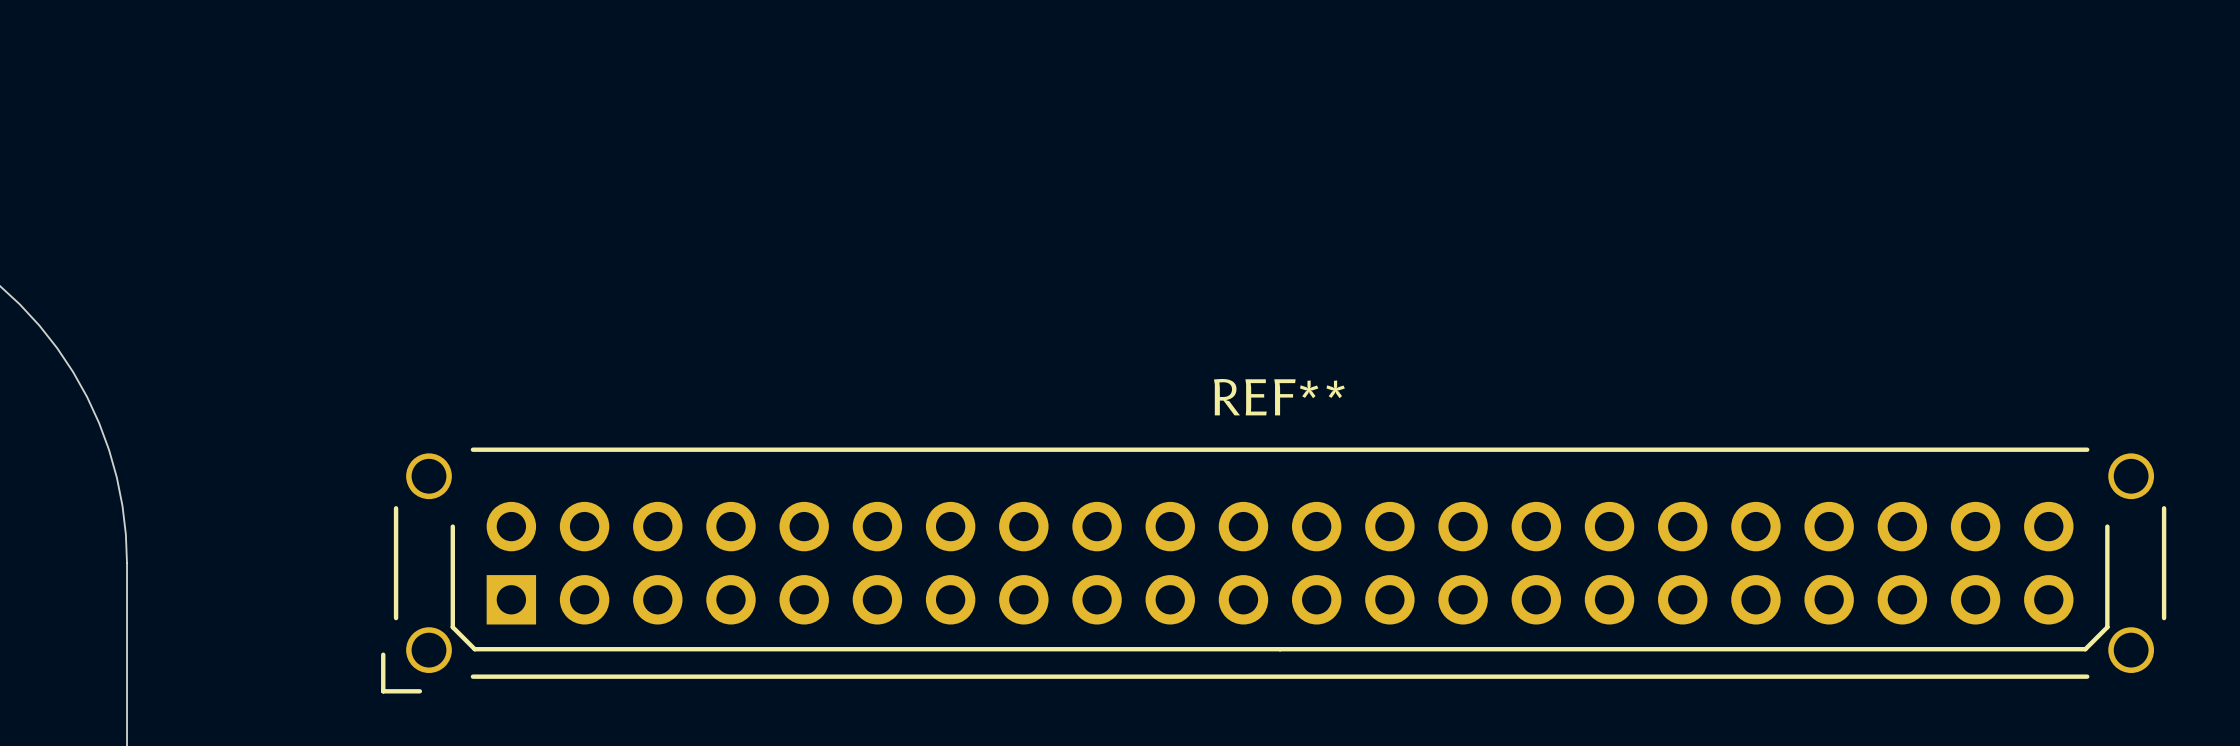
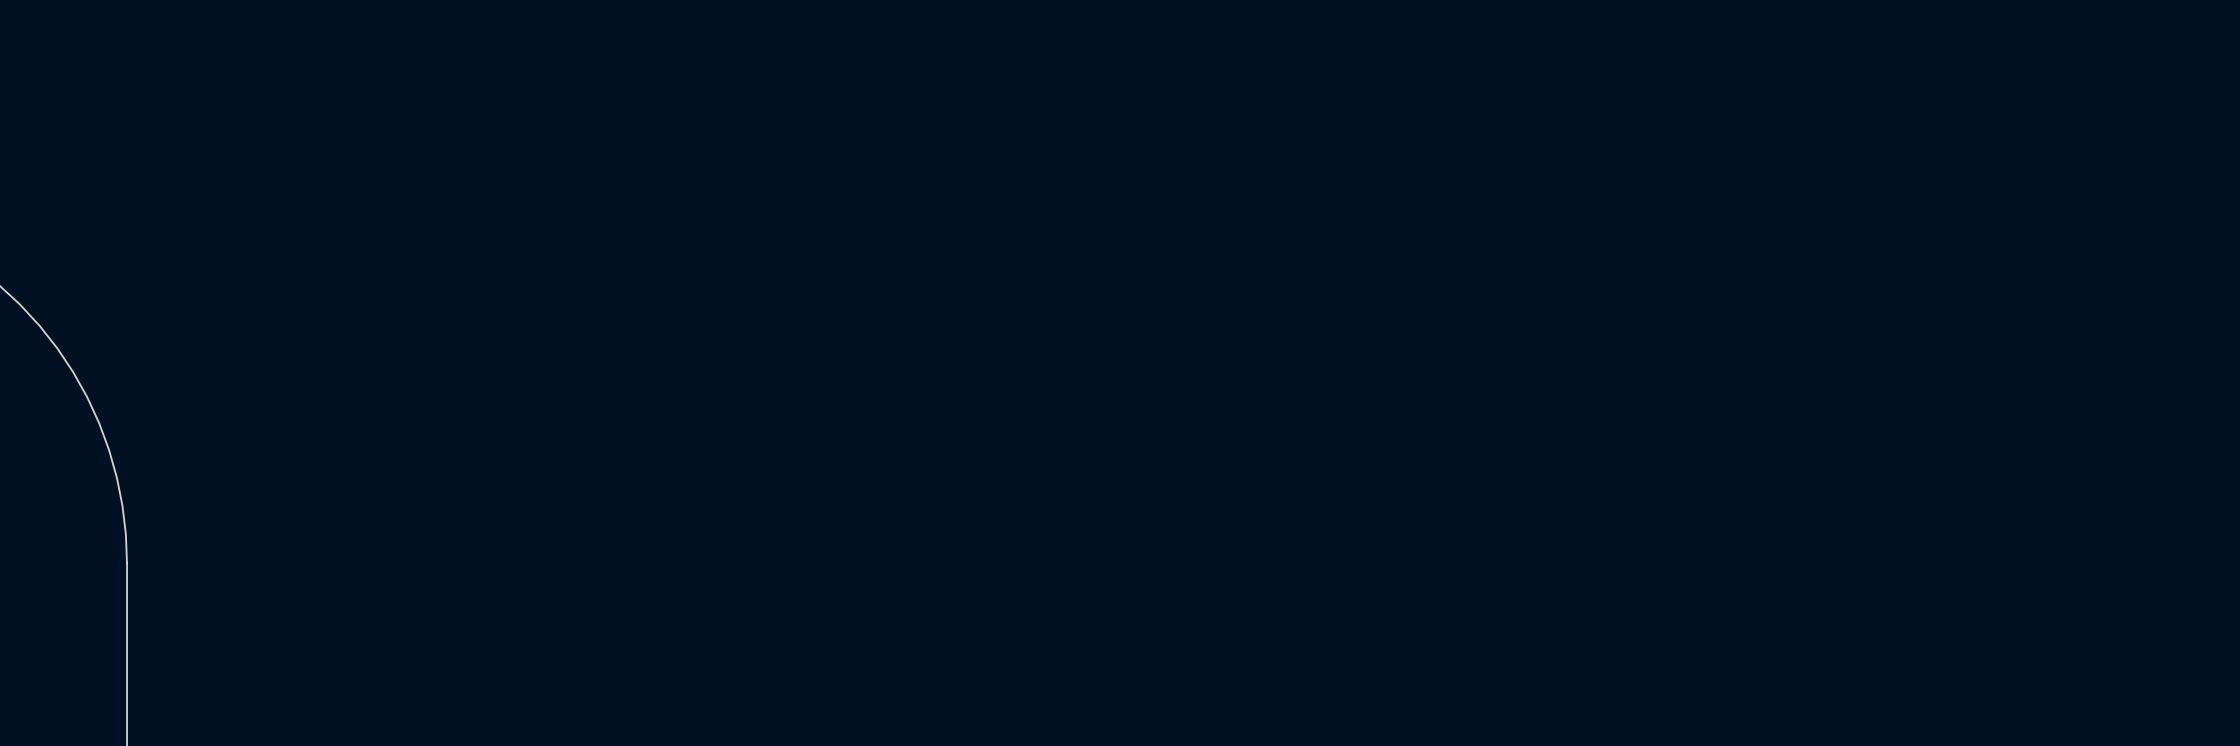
REF**: (1273, 570) -> none

